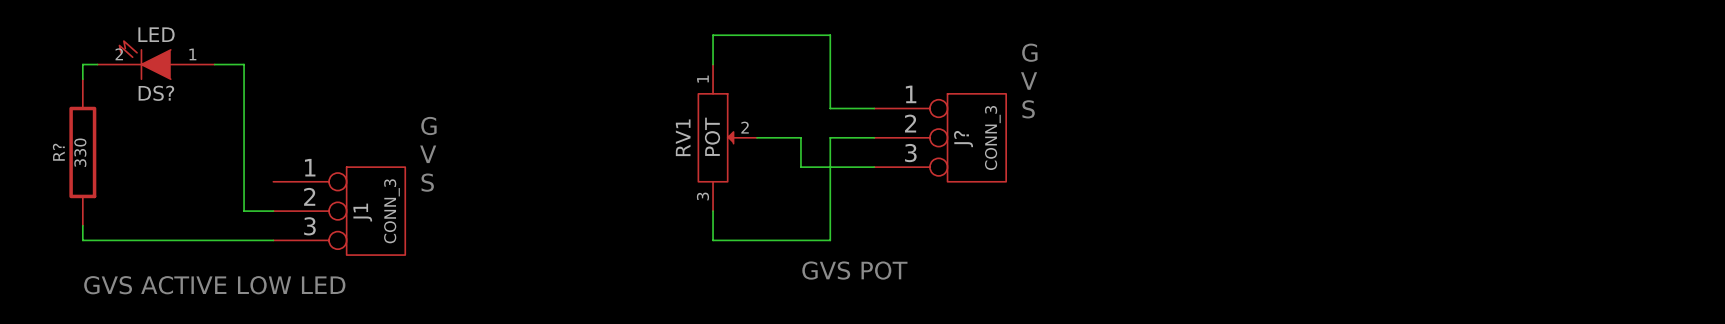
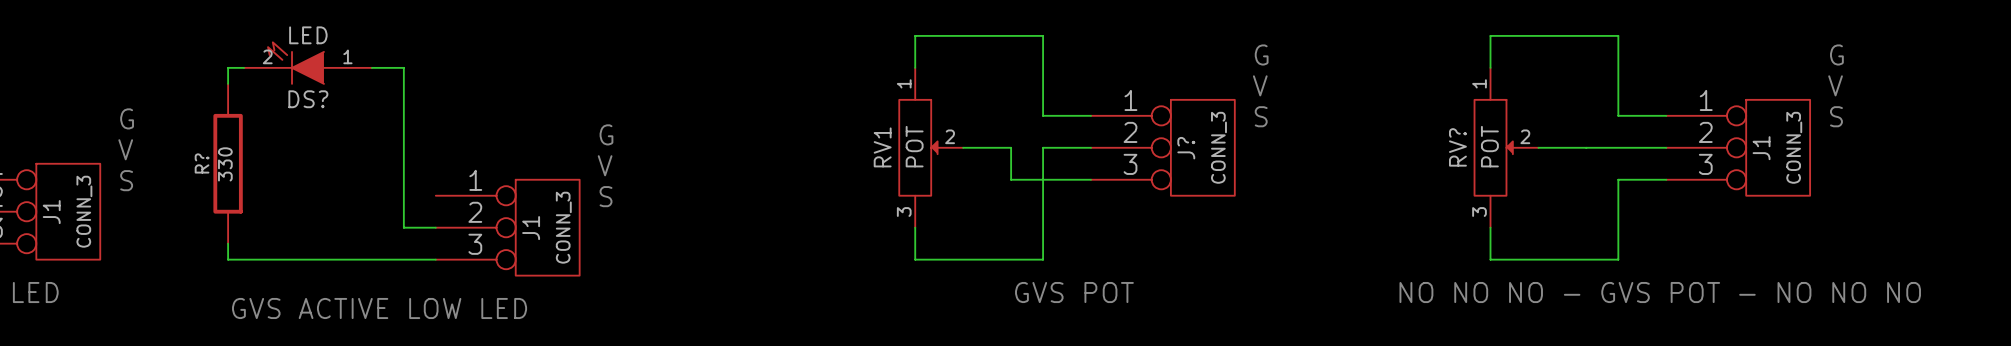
text: none -> G (1836, 54)
wire: none -> (1490, 67) (1490, 35) (1618, 35) (1618, 115) (1666, 115)
text: none -> V (1835, 85)
text: none -> S (1836, 116)
RV?: none -> POT (1506, 147)
wire: none -> (1538, 147) (1666, 147)
J1: none -> CONN_3 (1738, 147)
wire: none -> (1666, 179) (1618, 179) (1618, 259) (1490, 259) (1490, 227)
text: none -> NO NO NO - GVS POT - NO NO NO (1660, 292)

